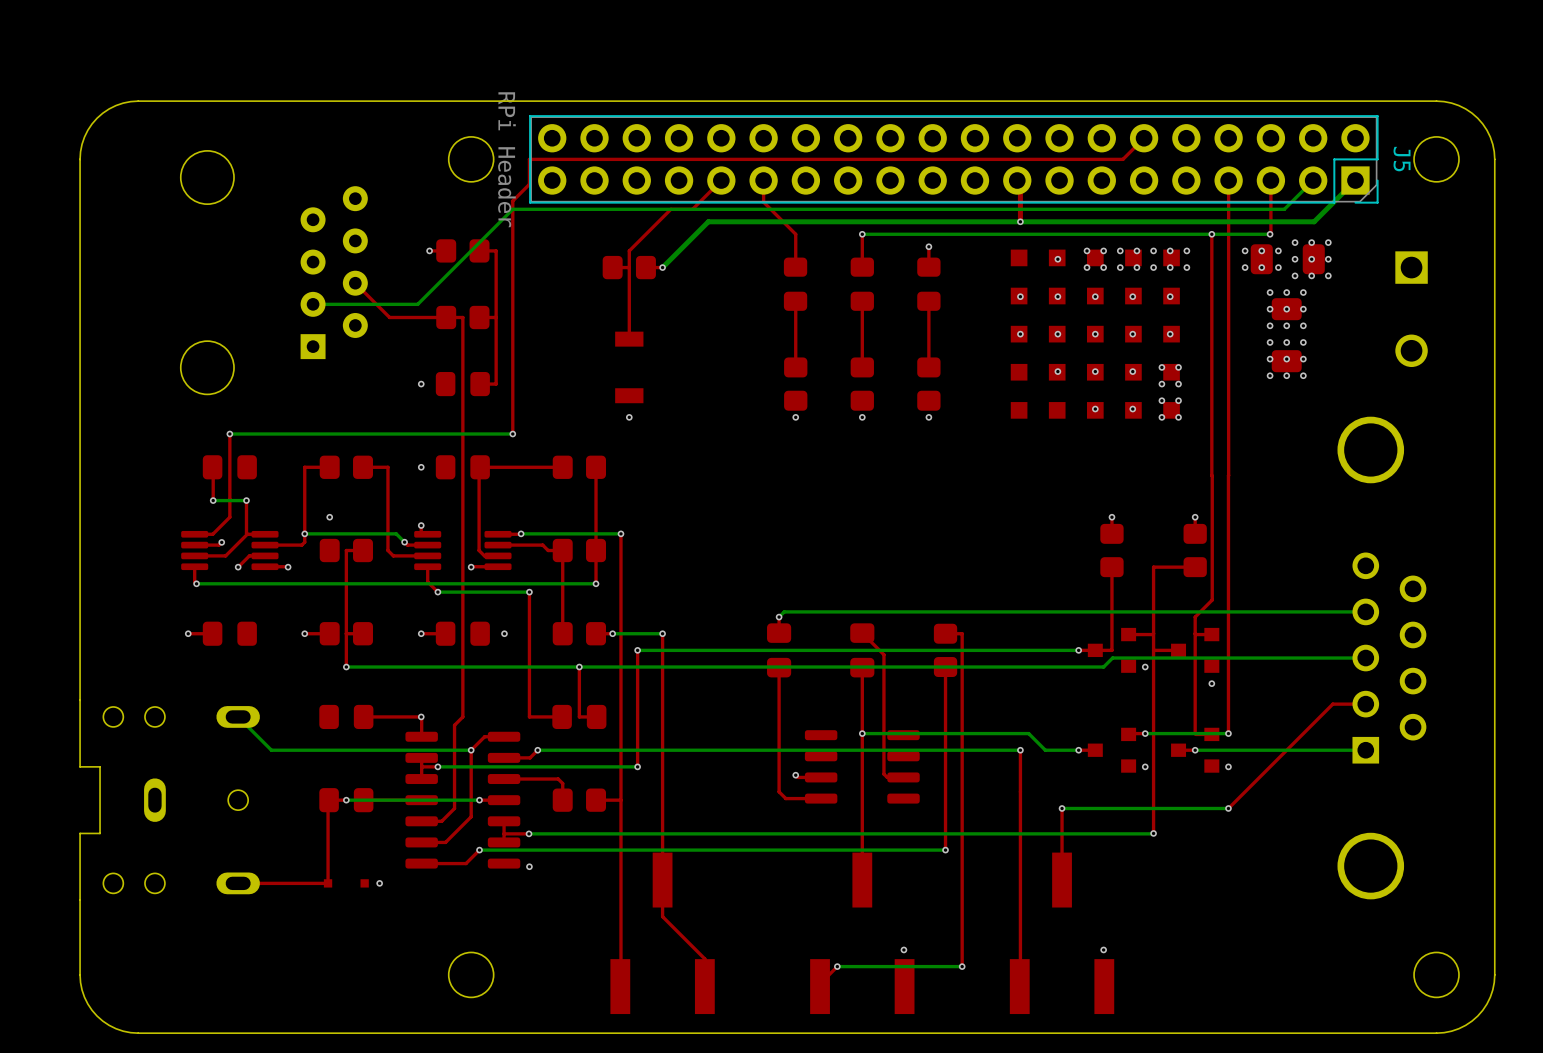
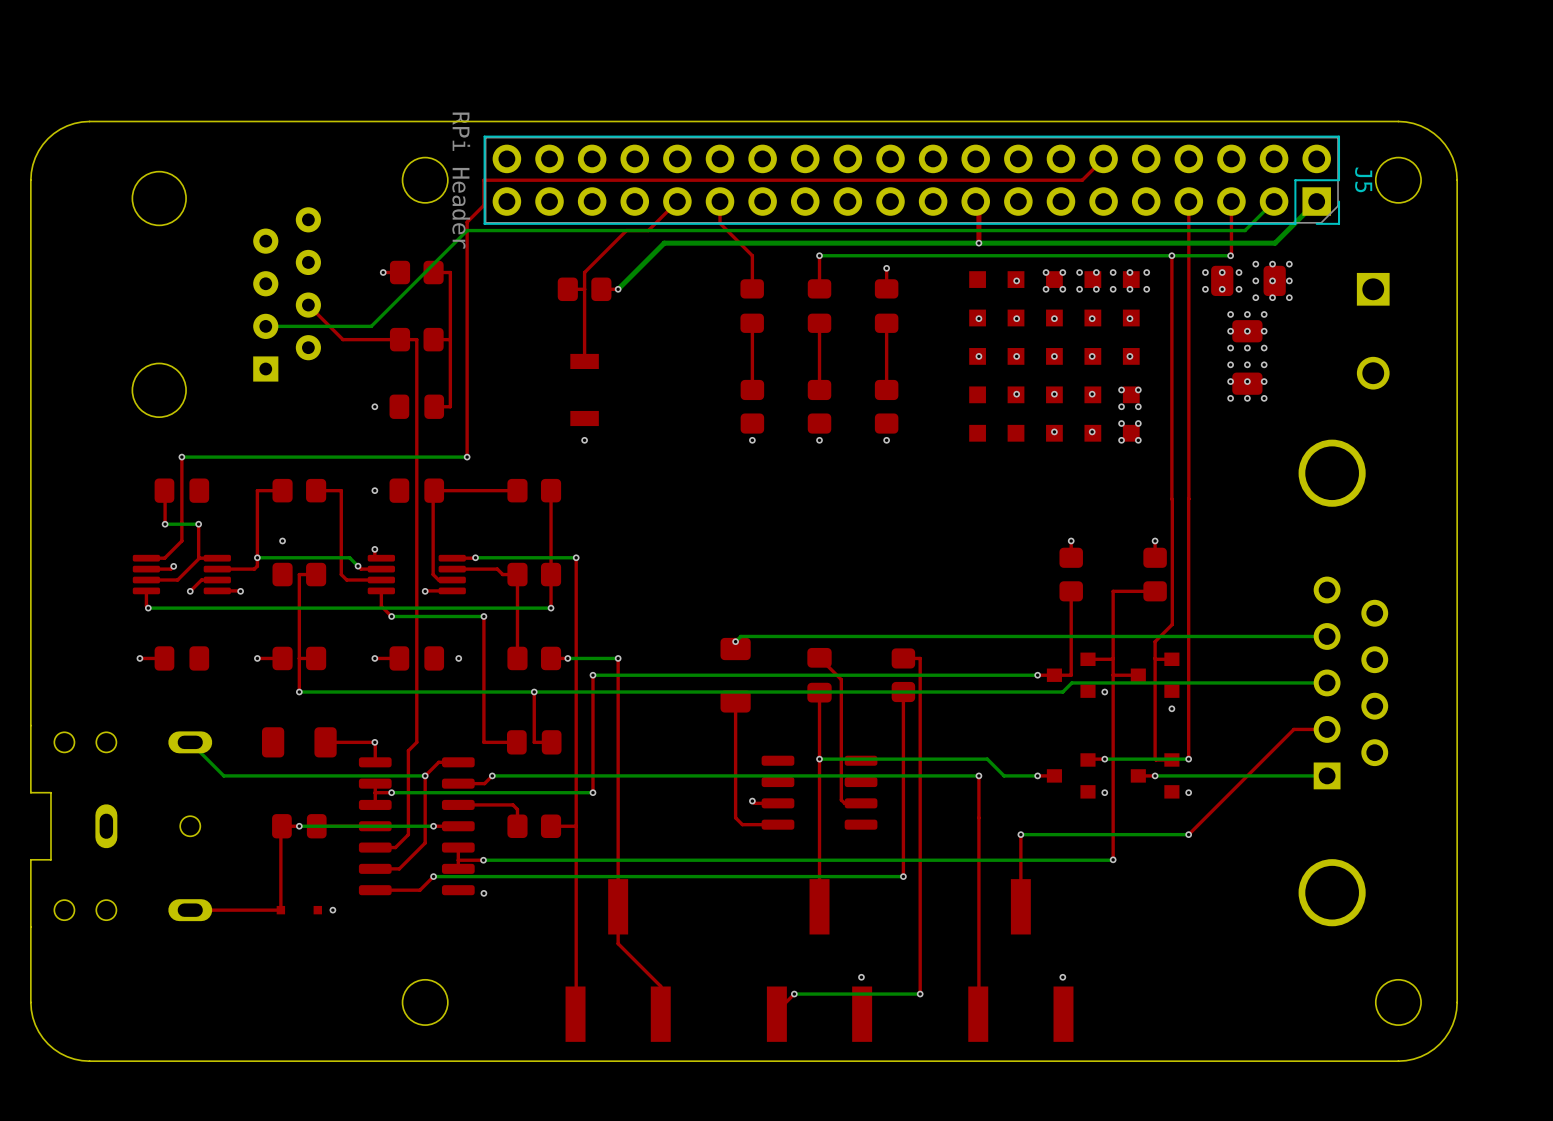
part footprint: [767, 623, 792, 678] -> [720, 637, 751, 713]
part footprint: [319, 704, 374, 730] -> [262, 727, 337, 758]

